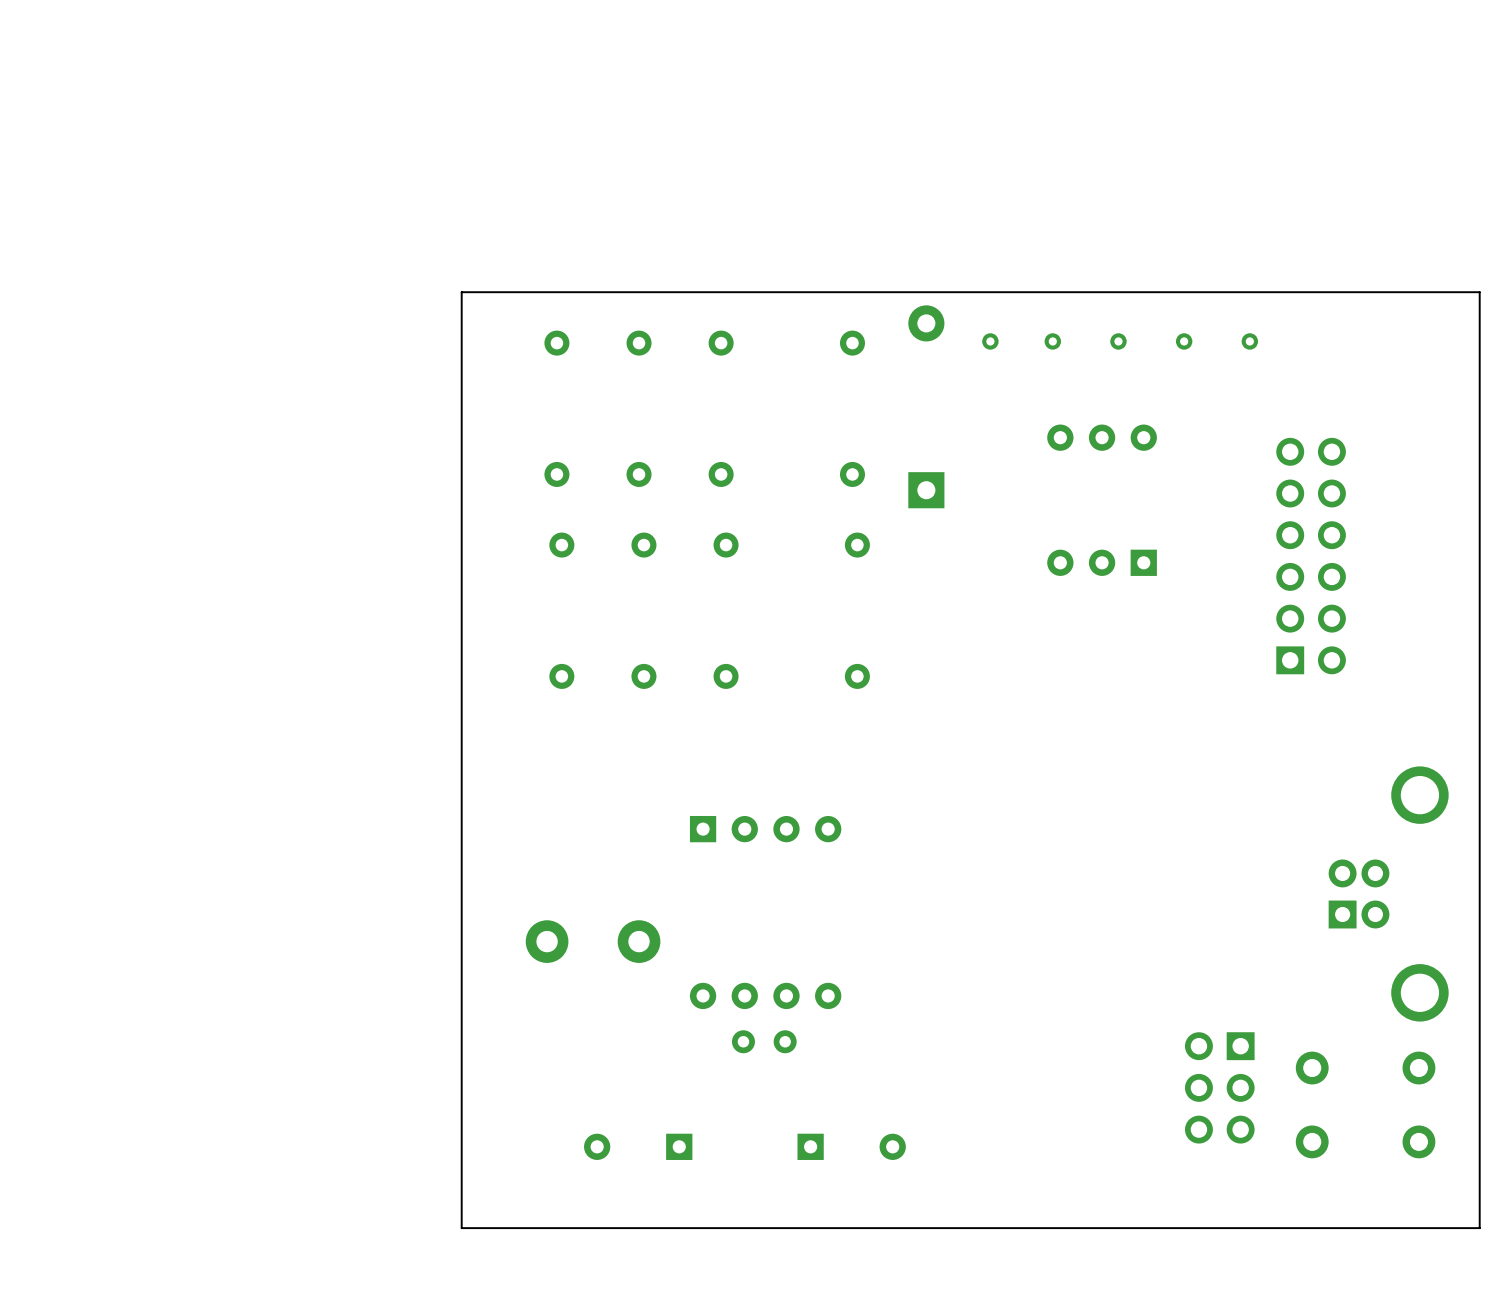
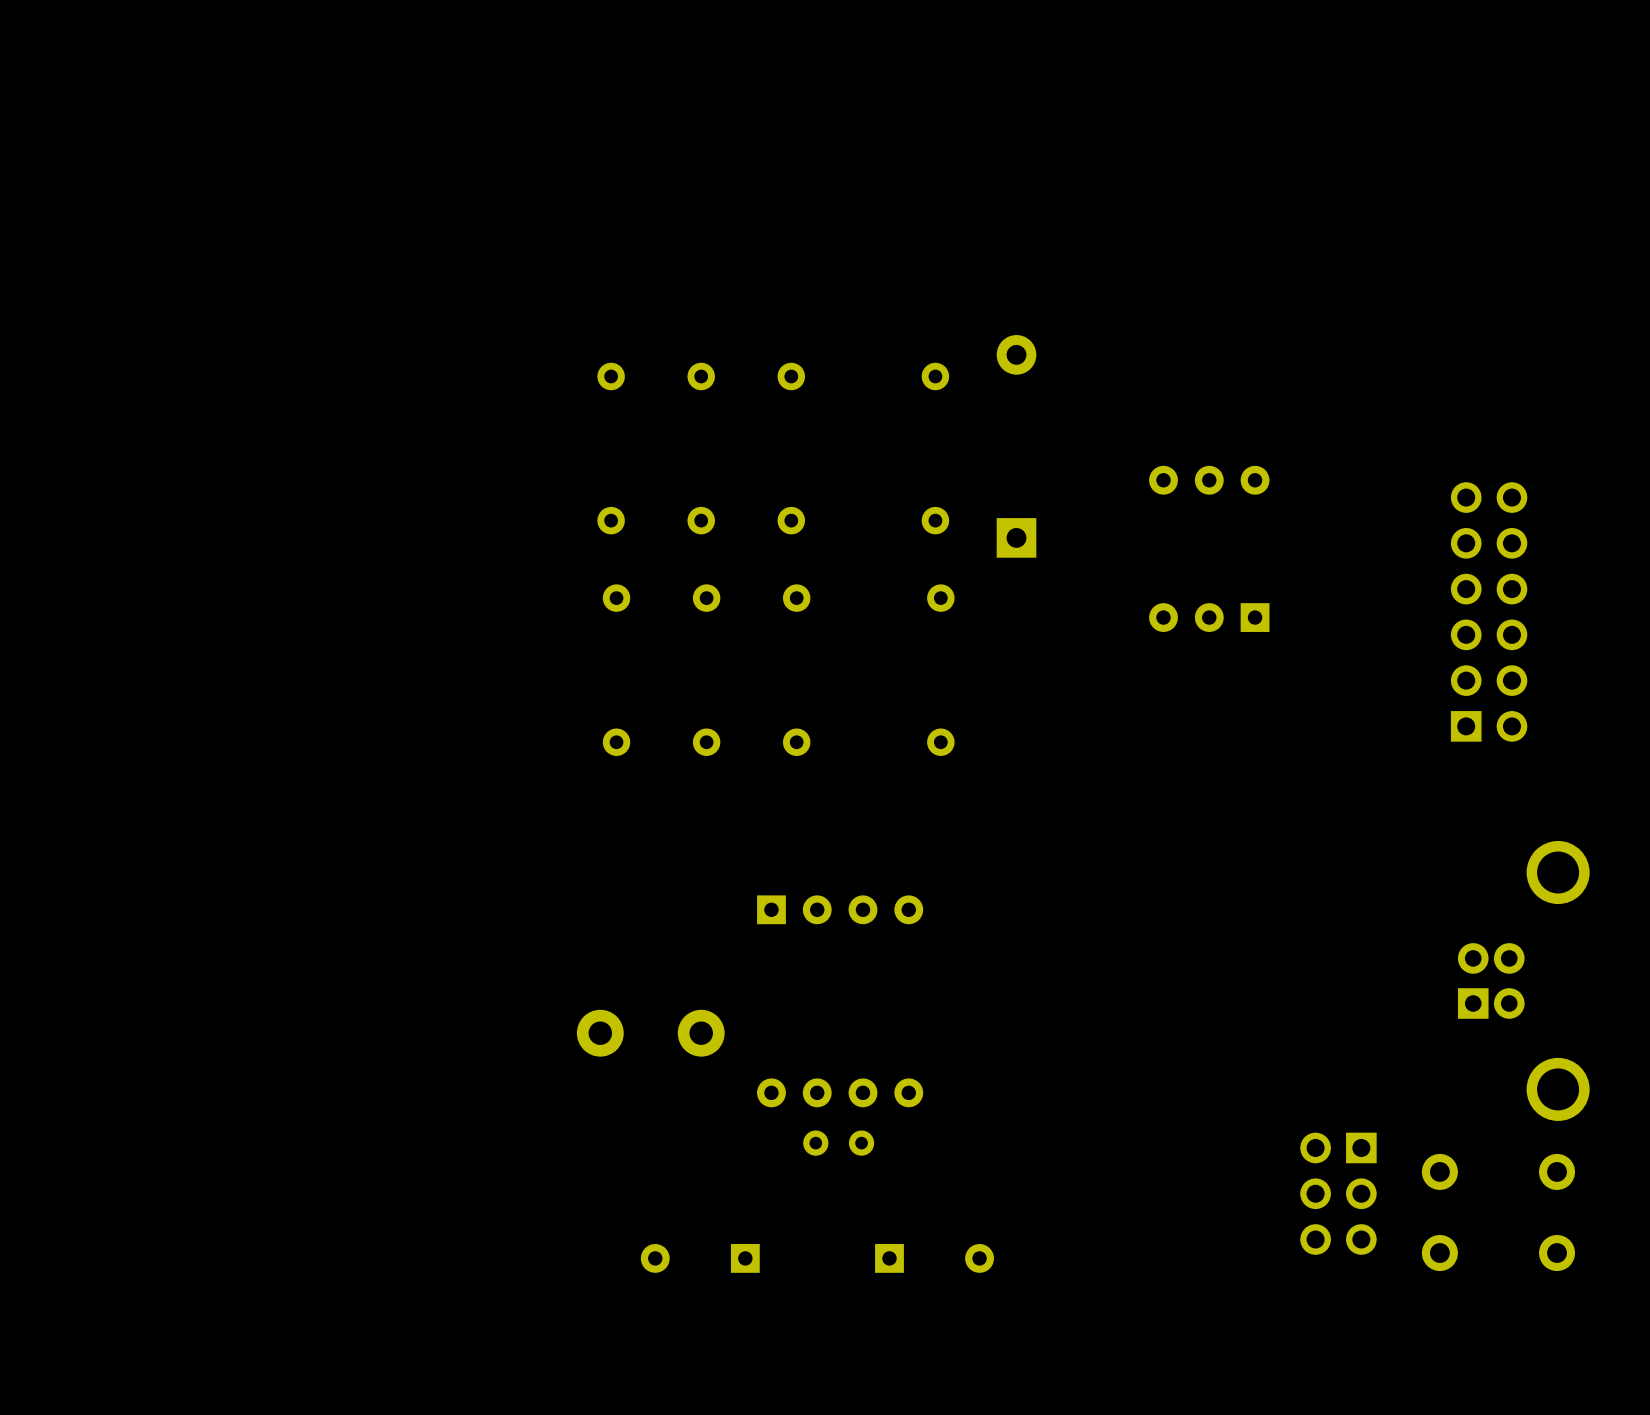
board edge: (1479, 292) (1479, 1228) (461, 1228) (461, 292) (1479, 292) -> none
part: (990, 341) -> none
part: (1052, 341) -> none
part: (1118, 341) -> none
part: (1184, 341) -> none
part: (1249, 341) -> none
part position: (1311, 556) -> (1489, 611)

